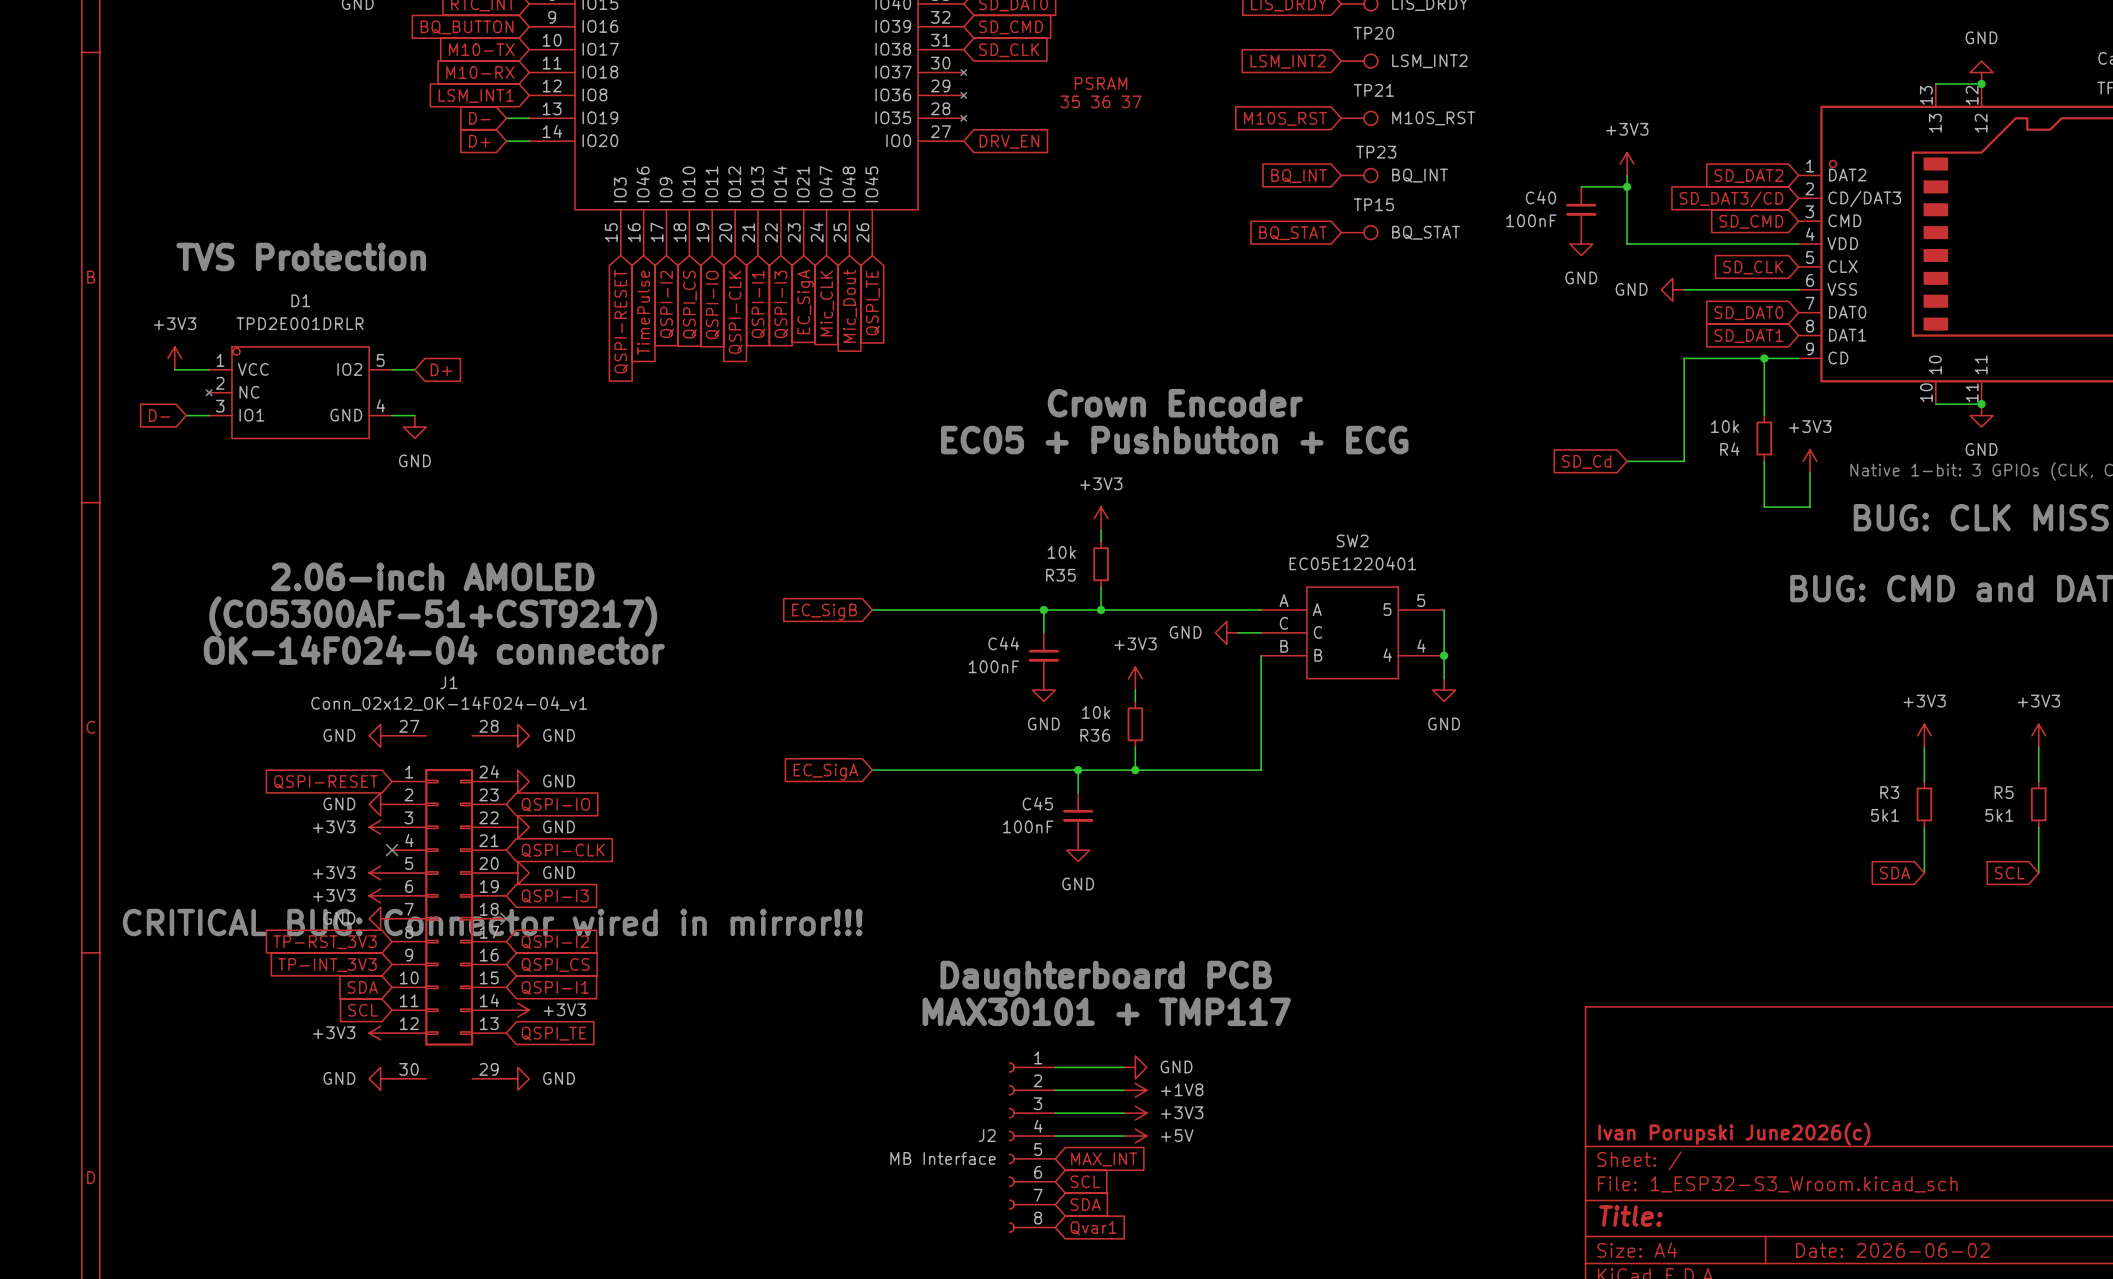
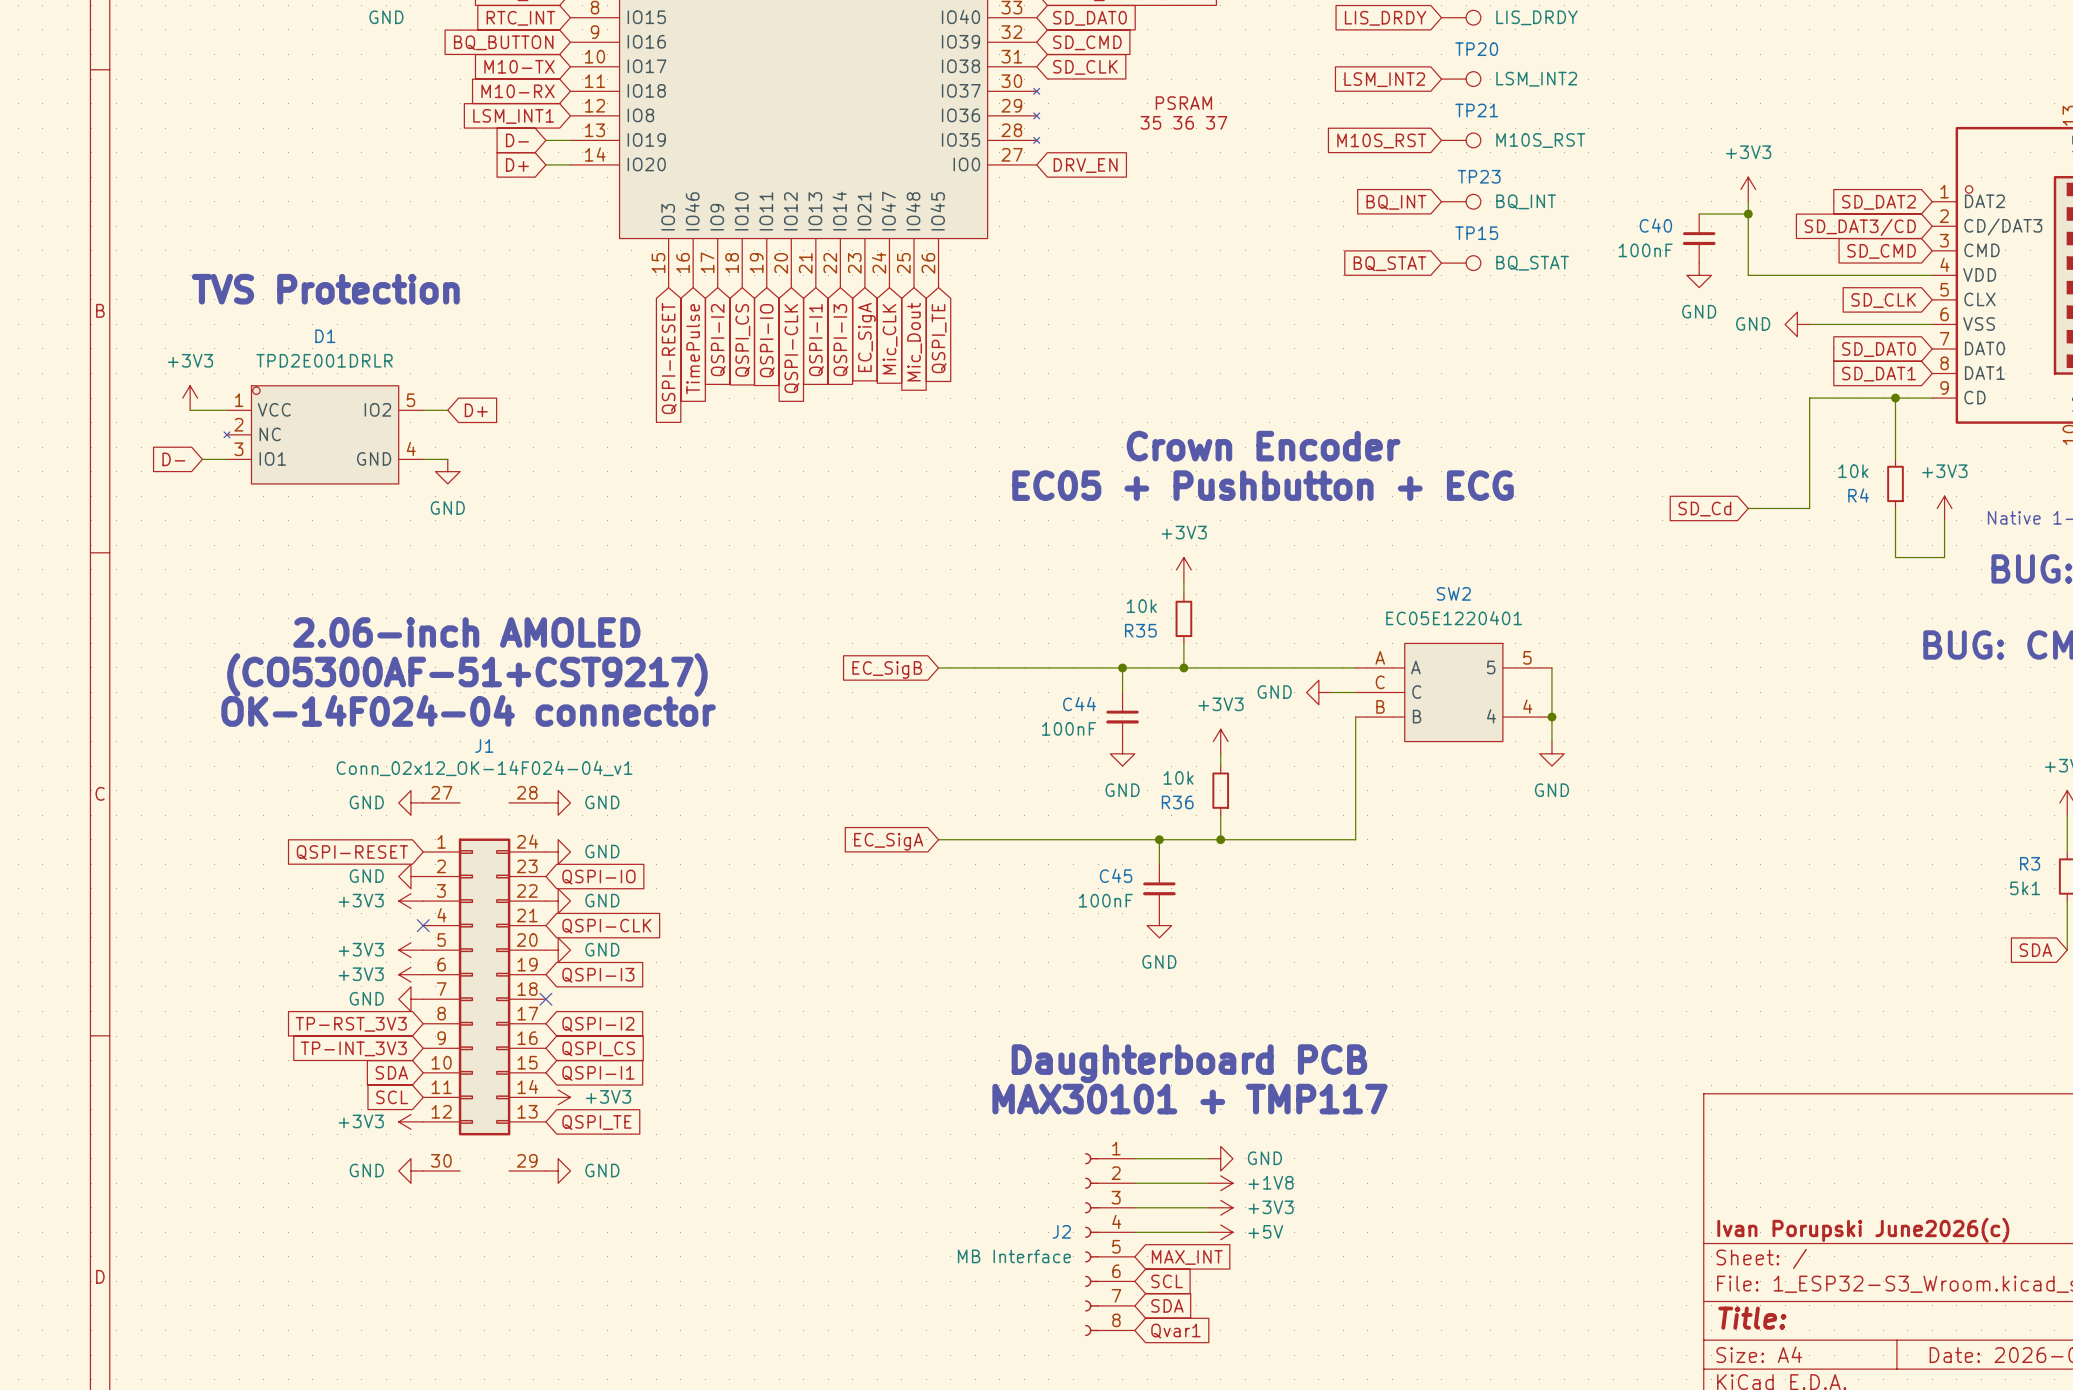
text: CRITICAL BUG: Connector wired in mirror!!! (492, 922) -> none

